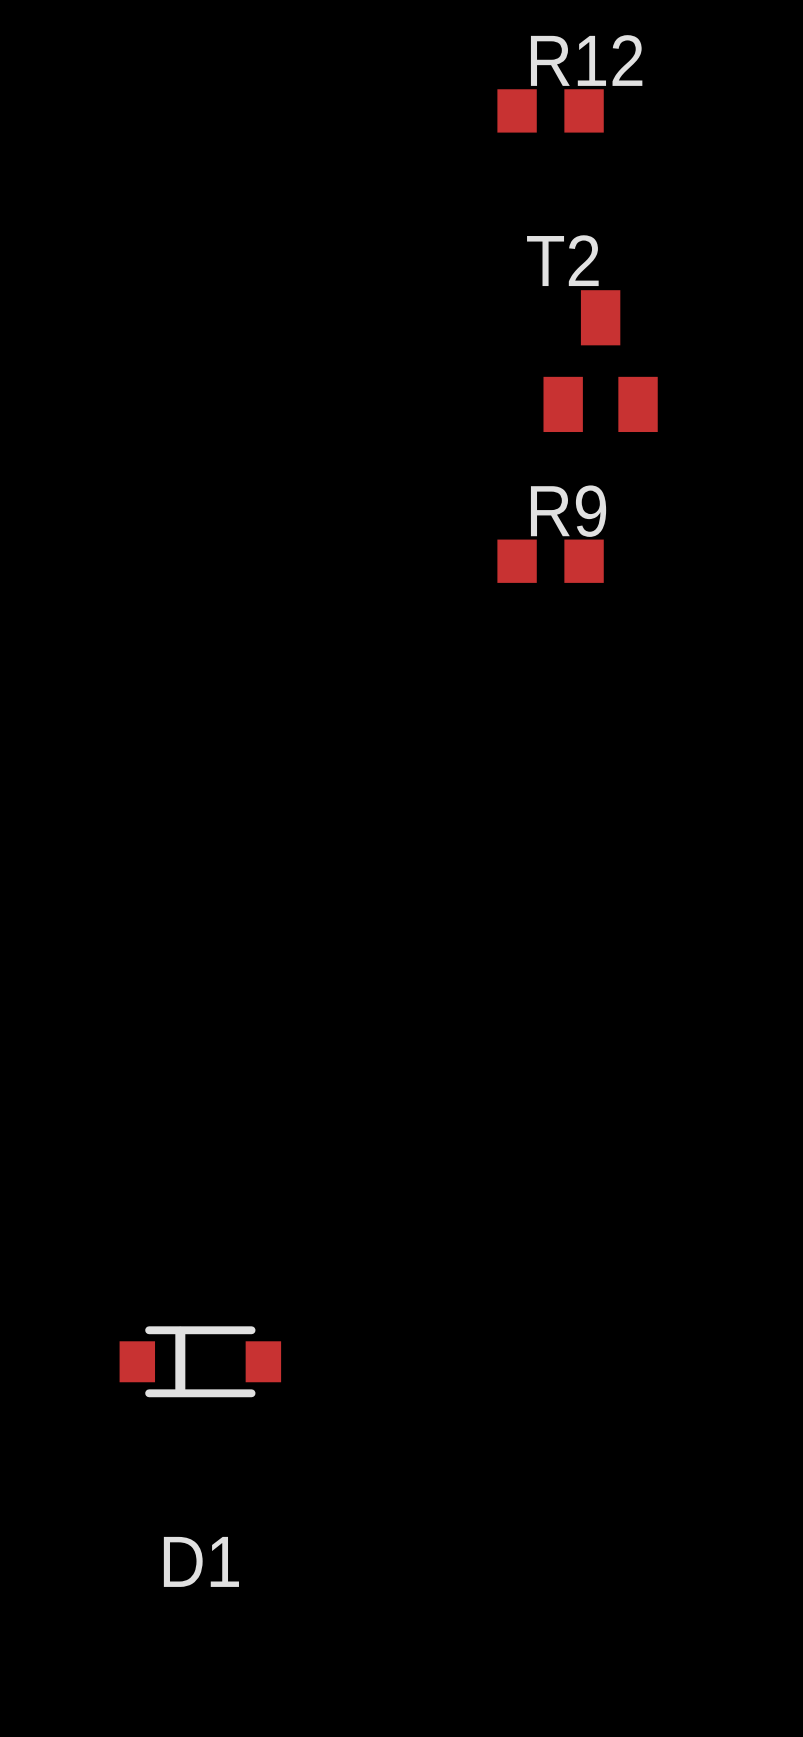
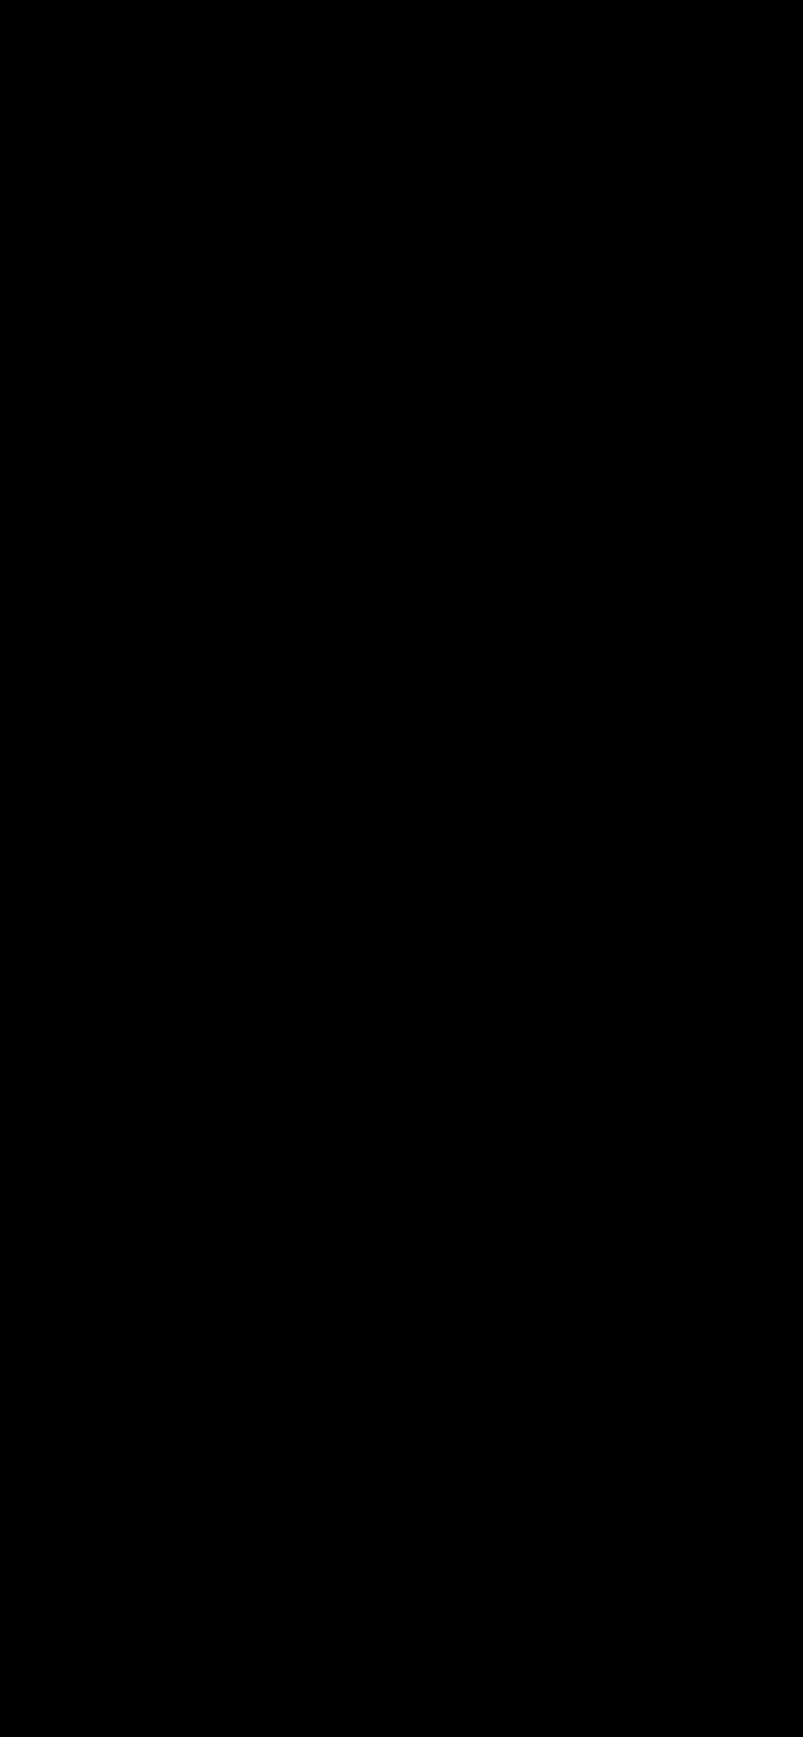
R12: (550, 110) -> none
T2: (600, 361) -> none
R9: (550, 561) -> none
D1: (200, 1361) -> none

